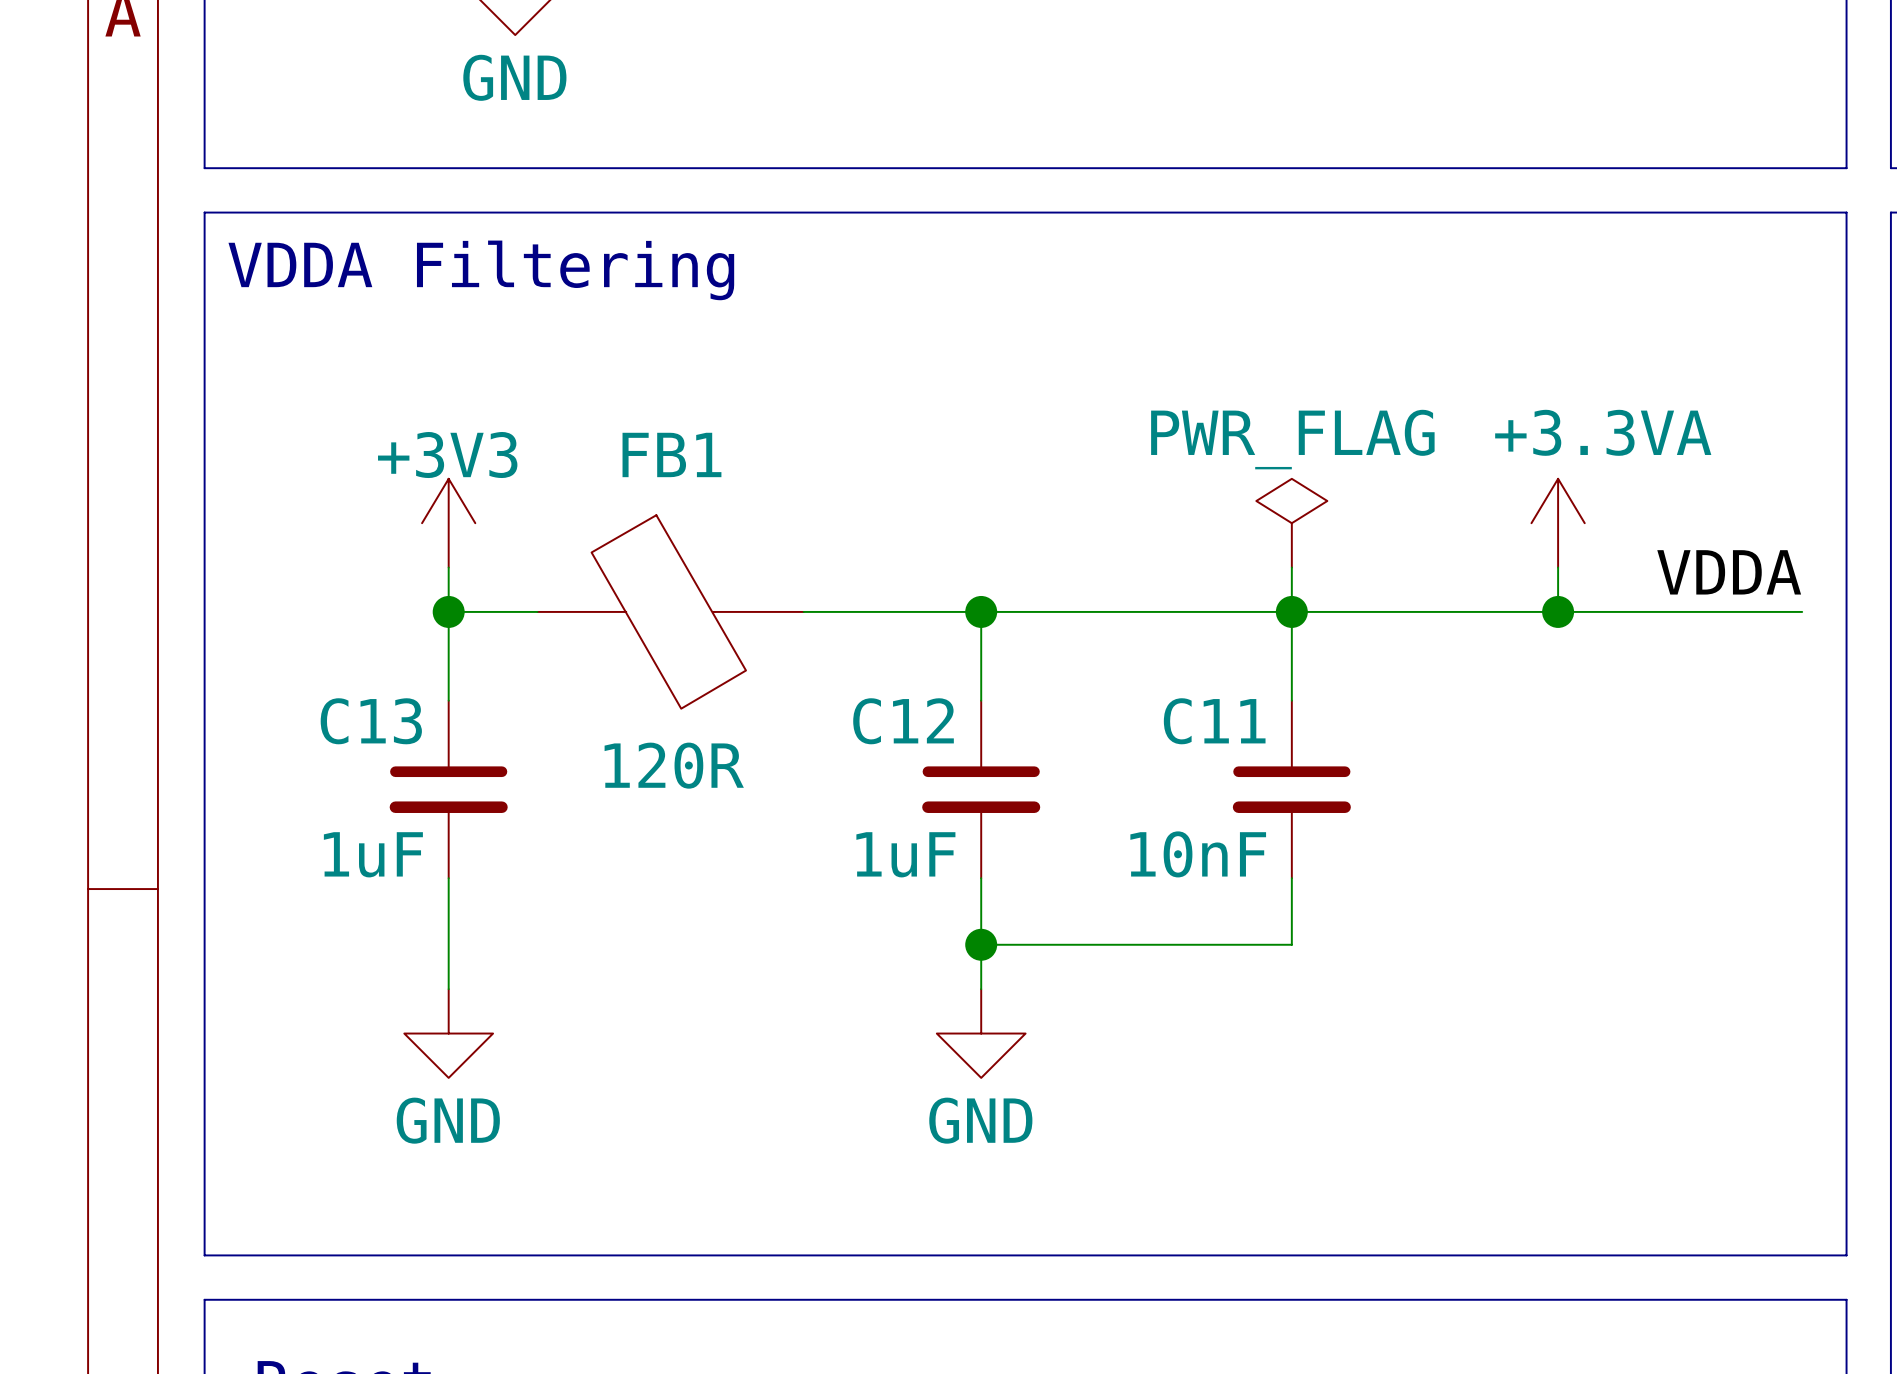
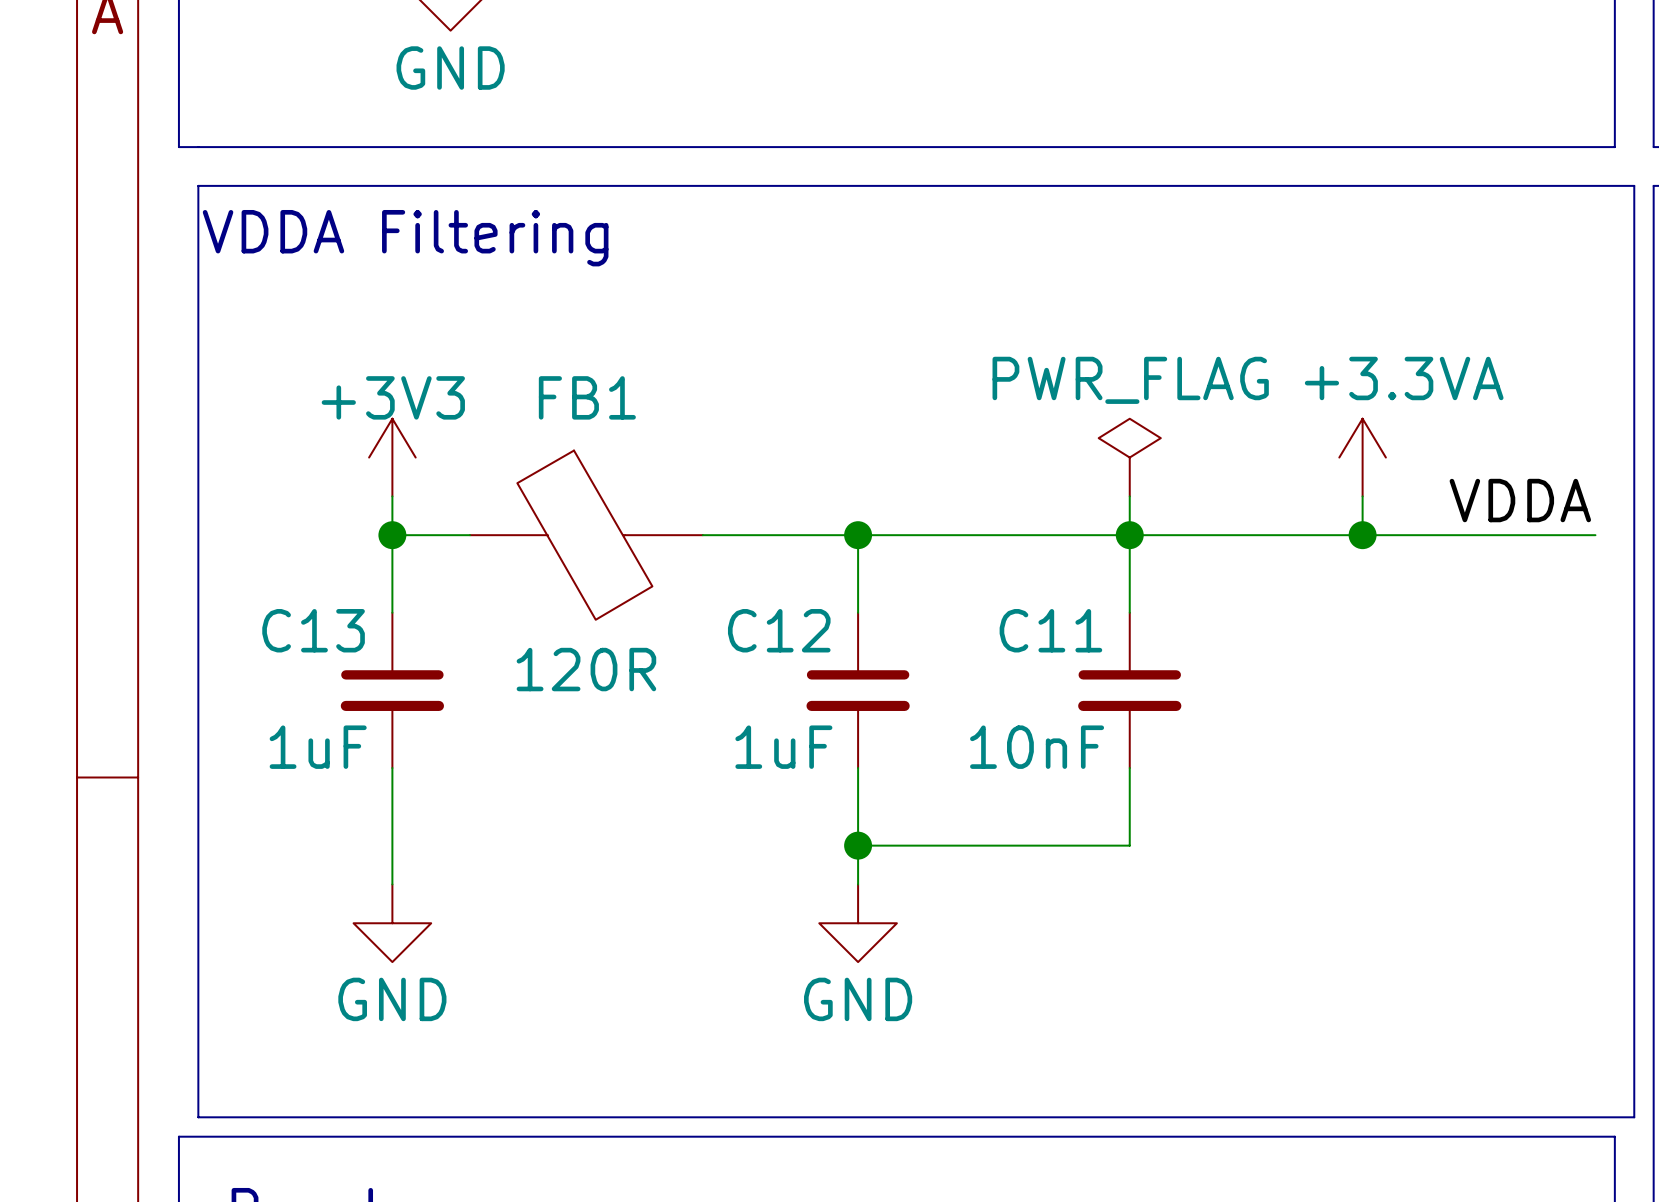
line: (226, 212) (204, 212) (204, 1255) (1846, 1255) (1846, 212) -> (198, 185) (198, 1117) (1634, 1117) (1634, 185) (1614, 185)
label position: VDDA (1729, 572) -> VDDA (1520, 500)
wire: none -> (1576, 535) (1595, 535)
wire: (981, 944) (1291, 944) -> (858, 845) (1129, 845) (1129, 826)
junction position: (981, 944) -> (858, 845)
power symbol position: GND (448, 1033) -> GND (392, 923)
power symbol position: GND (981, 1033) -> GND (858, 923)

